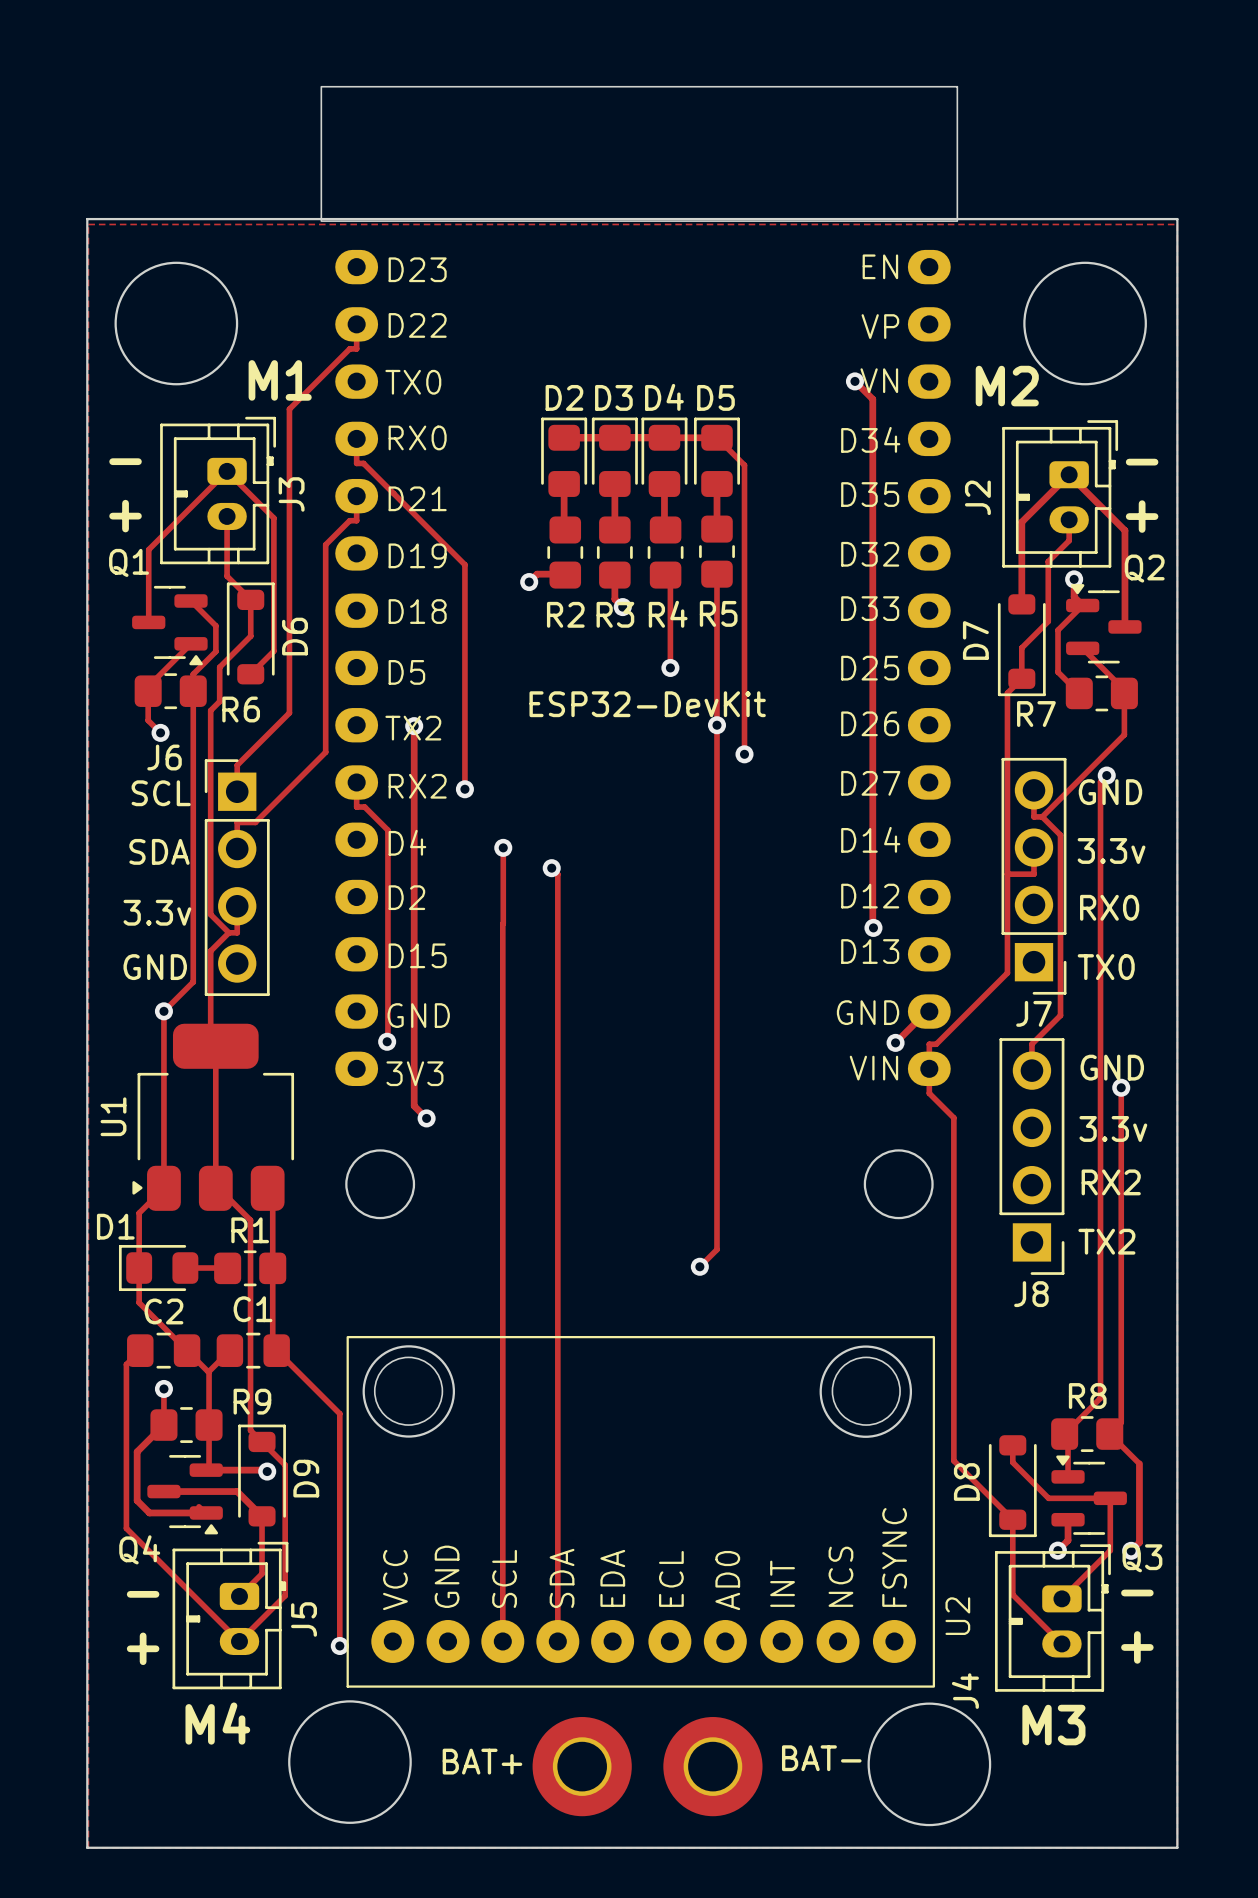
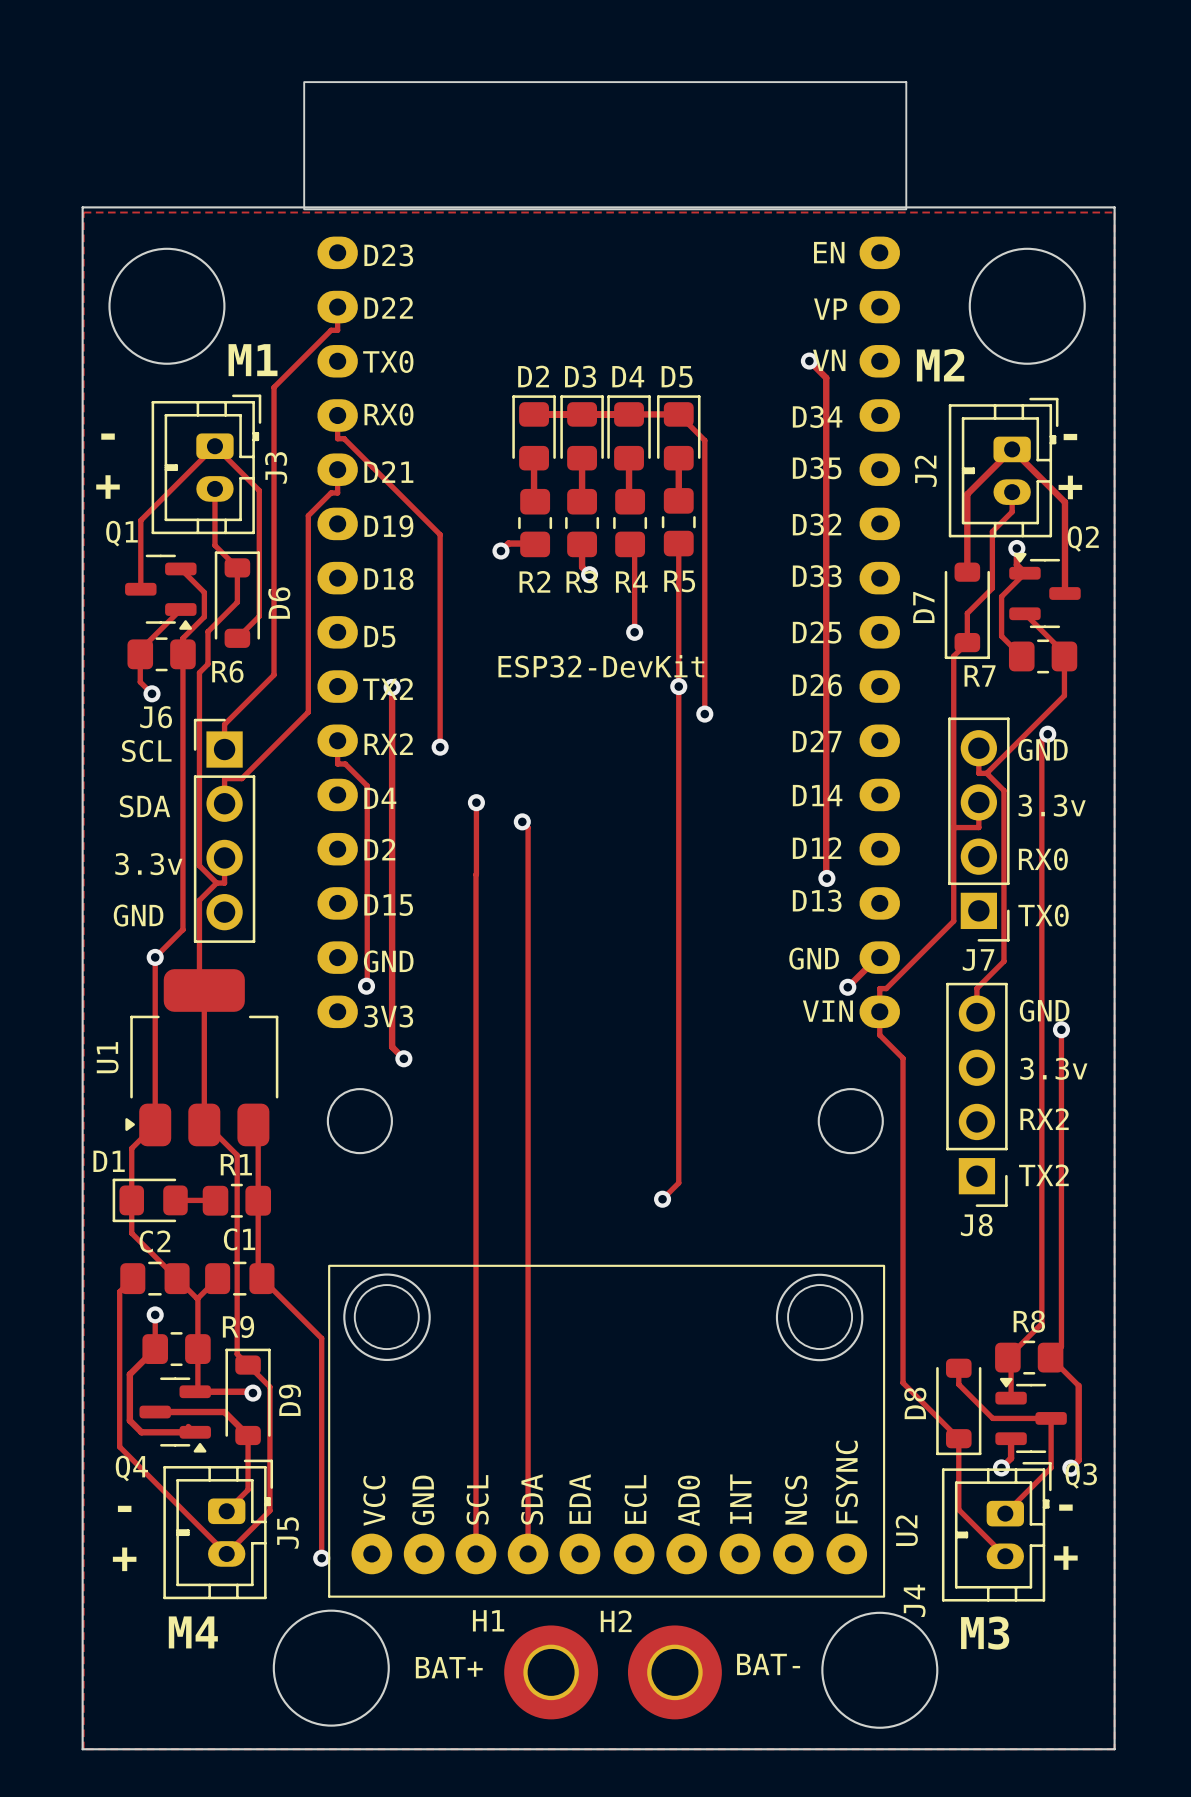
H1 name: none -> H1 (488, 1620)
H2 name: none -> H2 (616, 1621)

